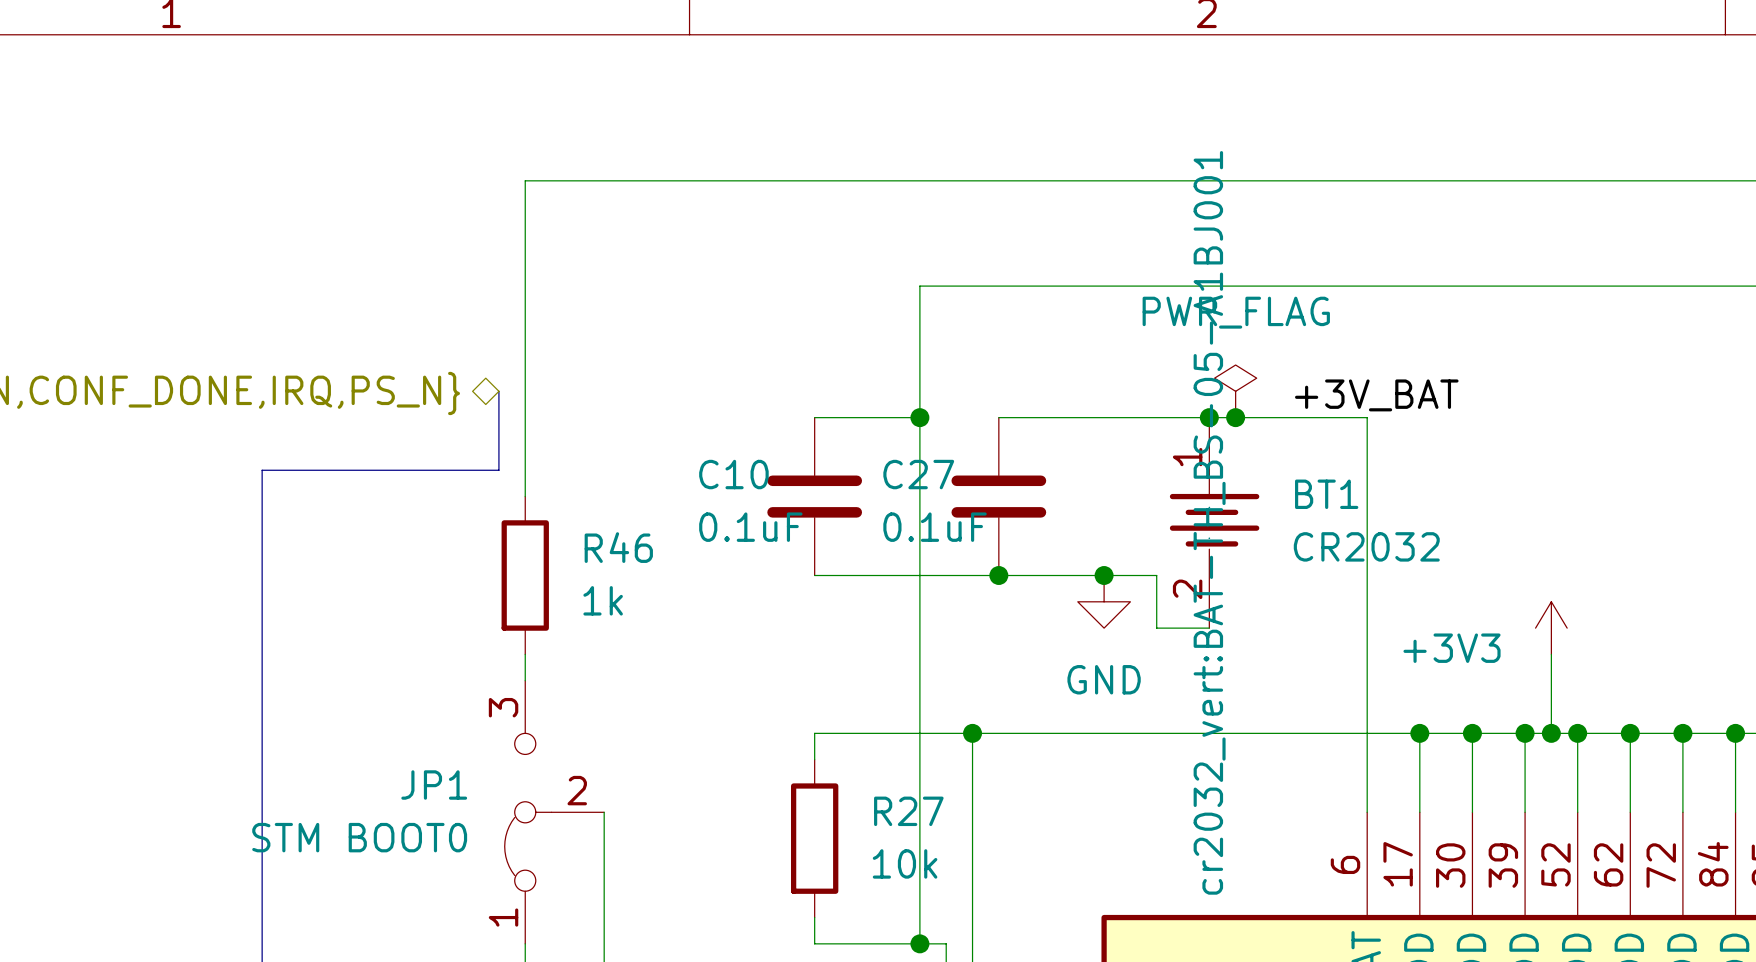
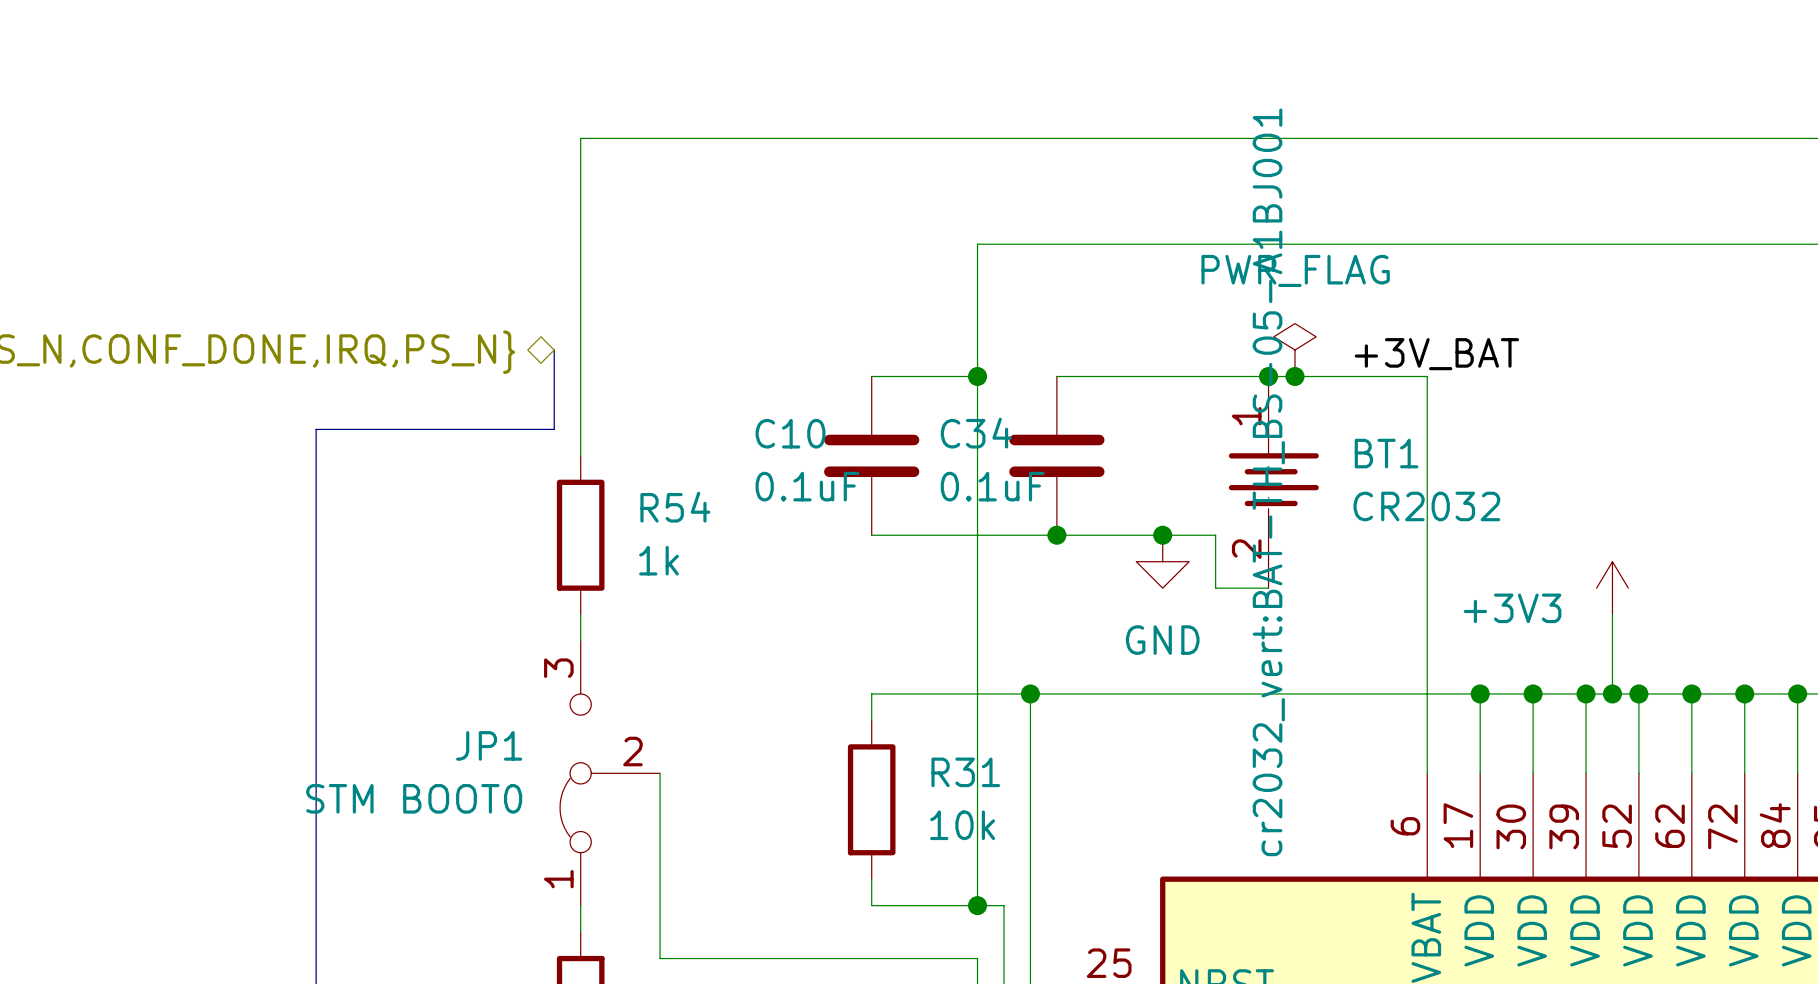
C27 name: C27 (918, 474) -> C34 (976, 433)
R46 name: R46 (618, 547) -> R54 (675, 507)
R27 name: R27 (908, 811) -> R31 (965, 772)

